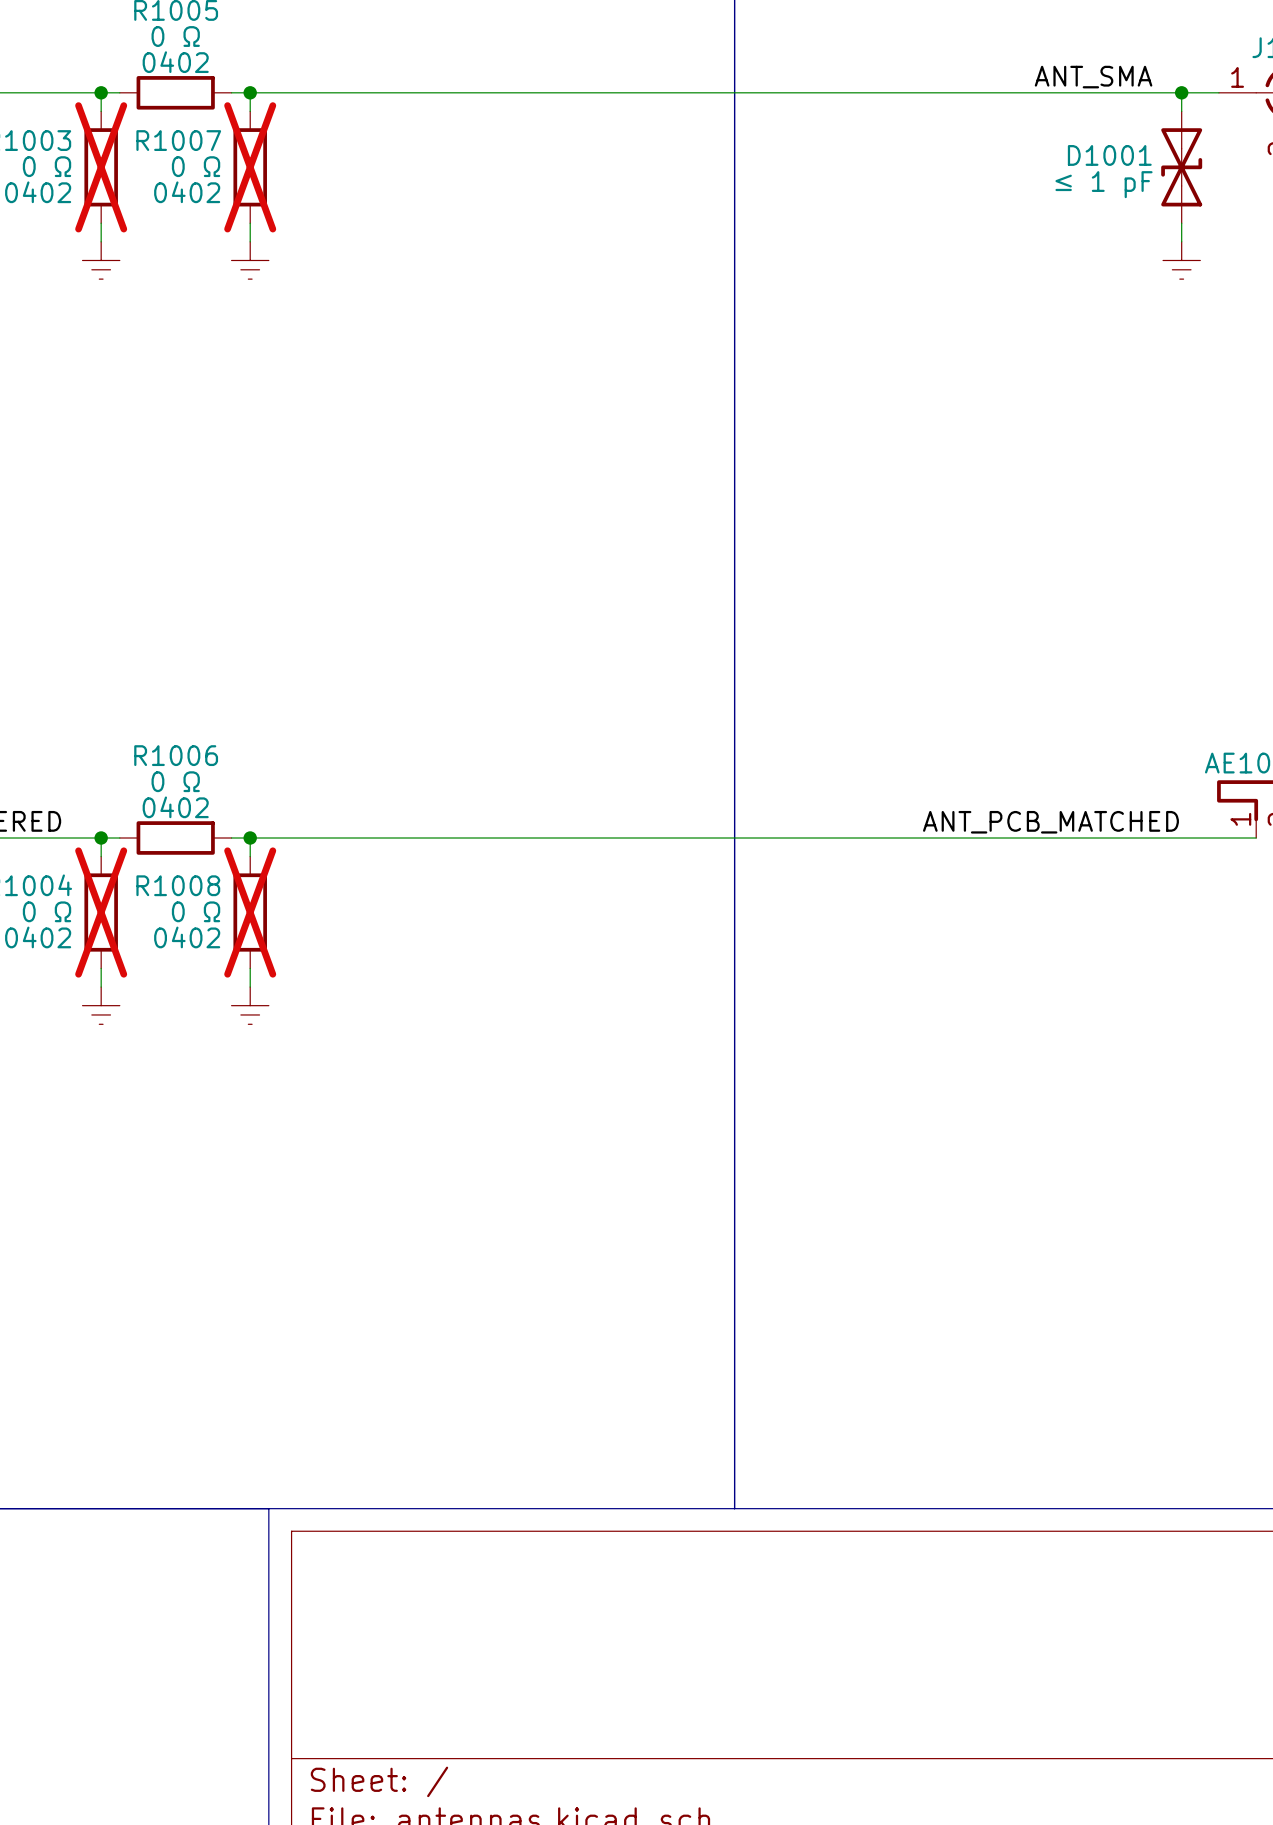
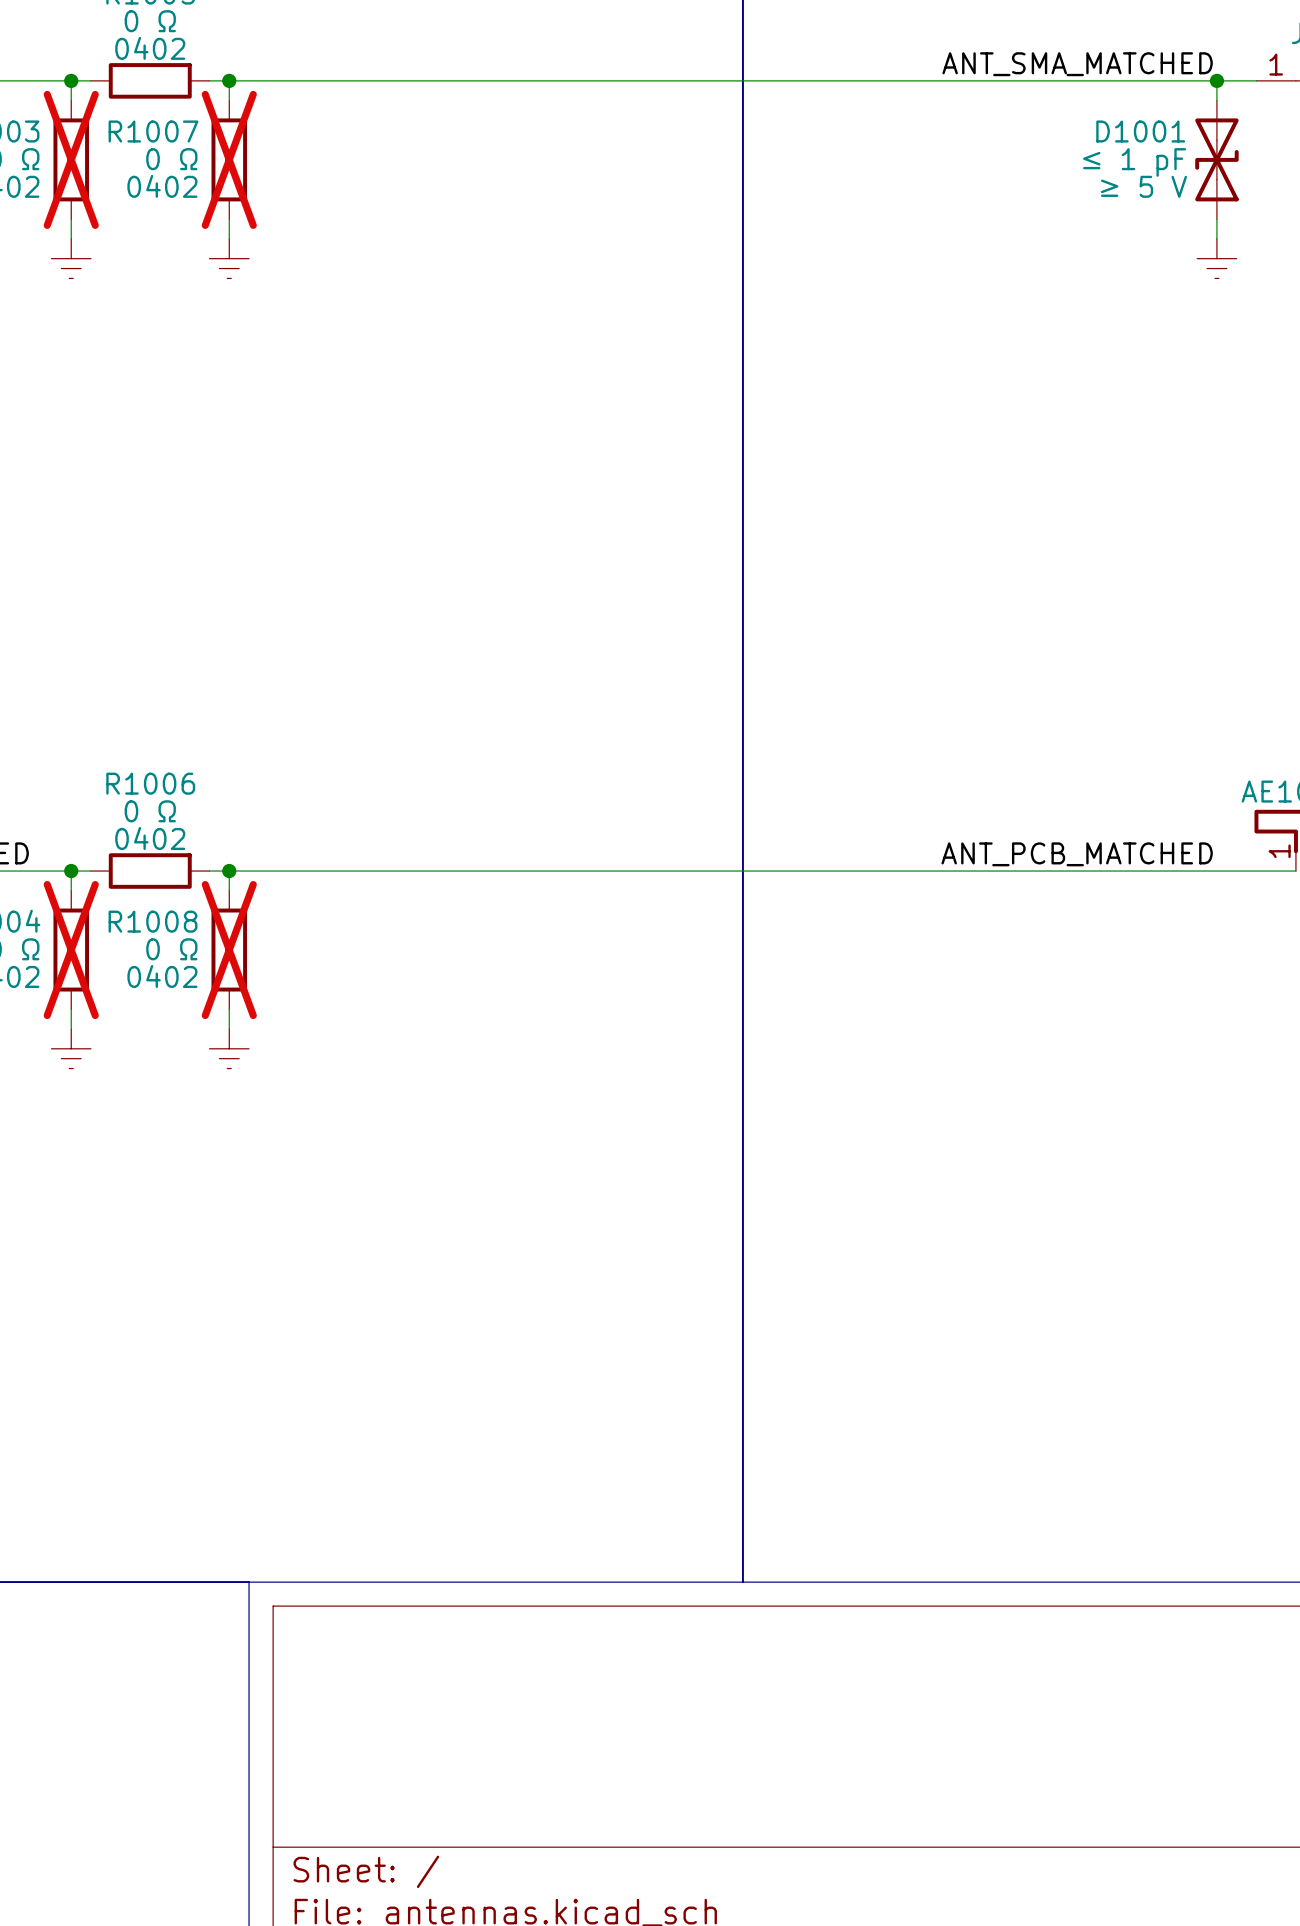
label: ANT_SMA (1093, 77) -> ANT_SMA_MATCHED (1077, 64)
D1001 name position: D1001 (1109, 155) -> D1001 (1140, 131)
D1001 text position: ≤ 1 pF (1104, 184) -> ≤ 1 pF (1134, 162)
D1001 text: none -> ≥ 5 V (1143, 186)
label position: ANT_PCB_MATCHED (1050, 822) -> ANT_PCB_MATCHED (1077, 854)

